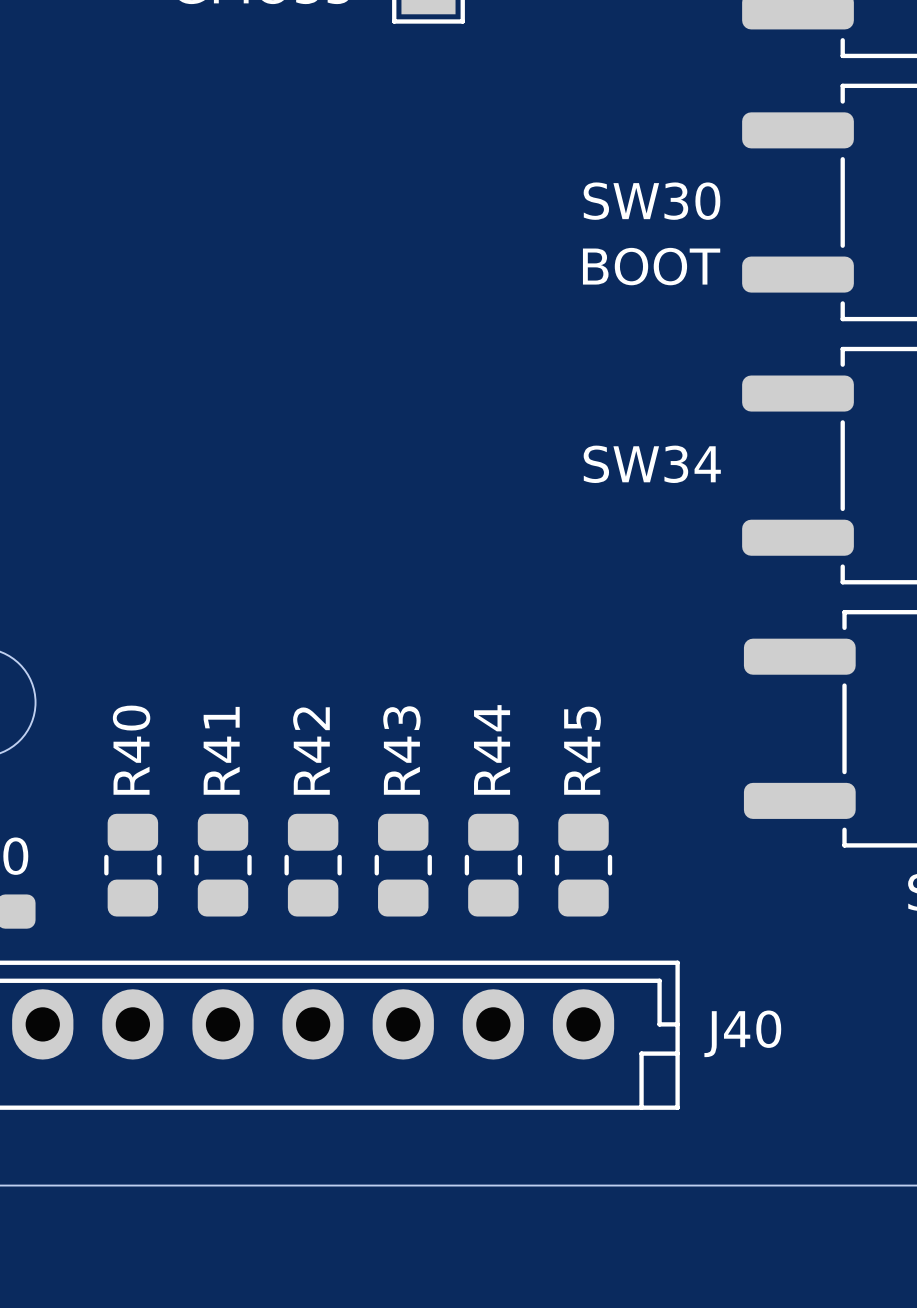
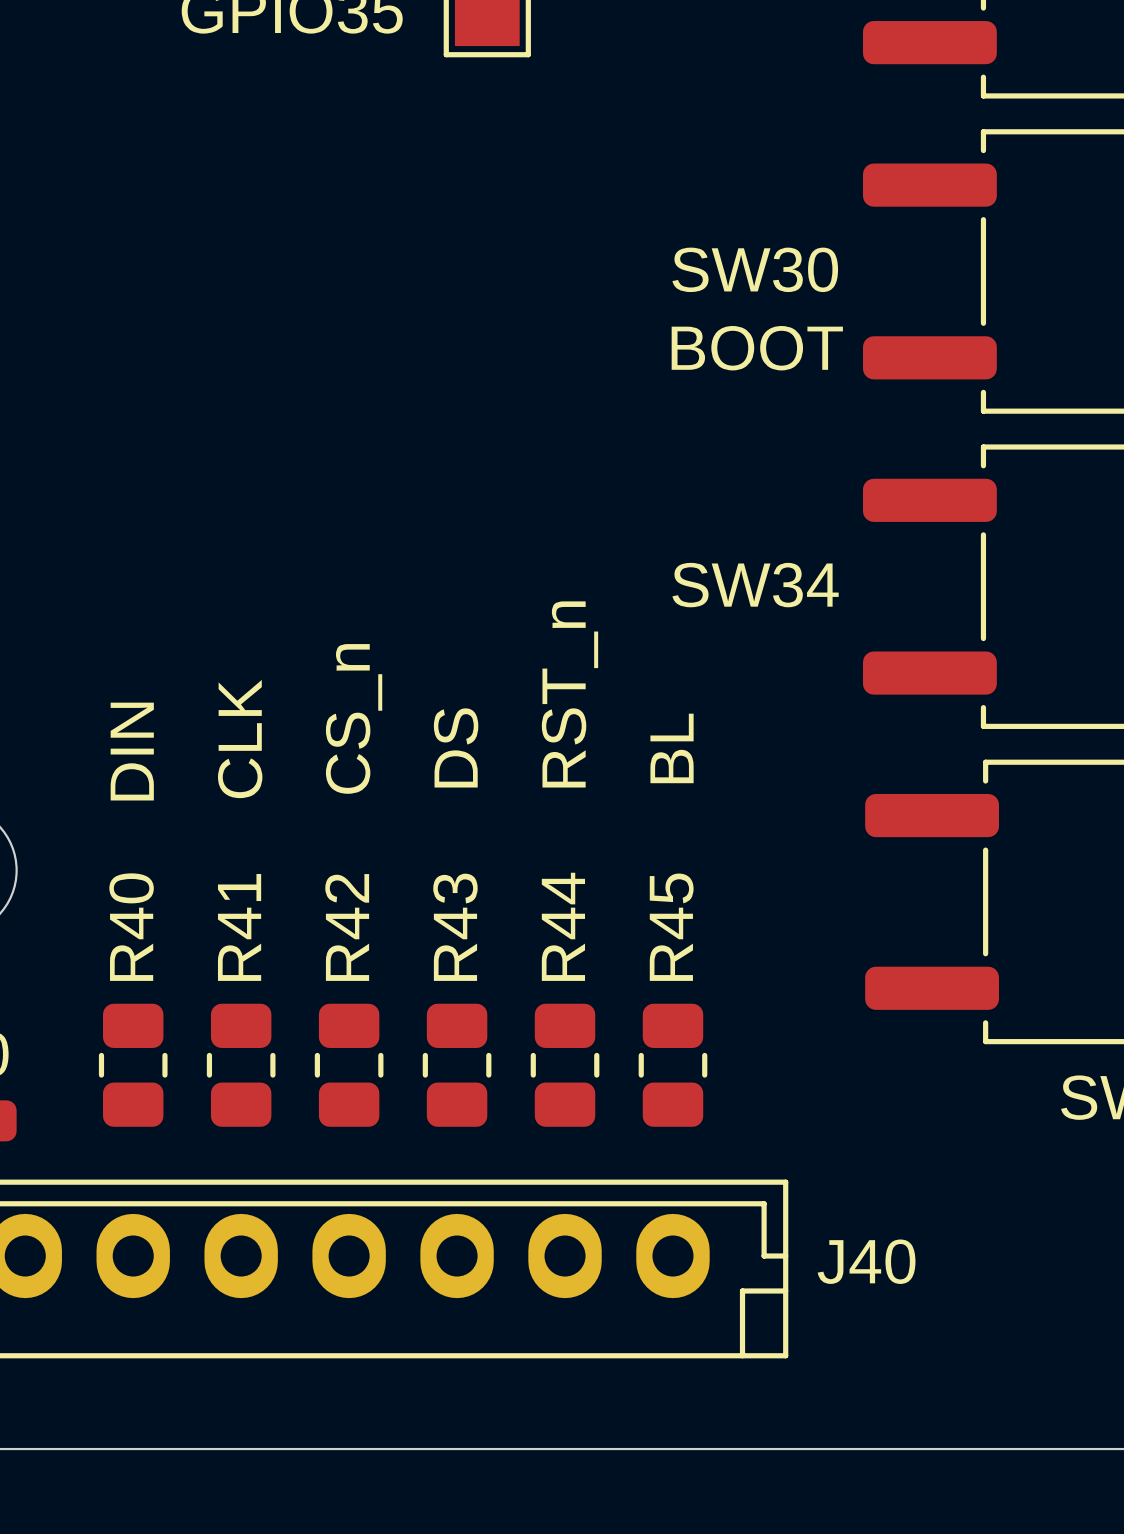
text: none -> RST_n (569, 694)
text: none -> CS_n (354, 718)
text: none -> CLK (240, 739)
text: none -> BL (672, 748)
text: none -> DS (456, 747)
text: none -> DIN (132, 751)

